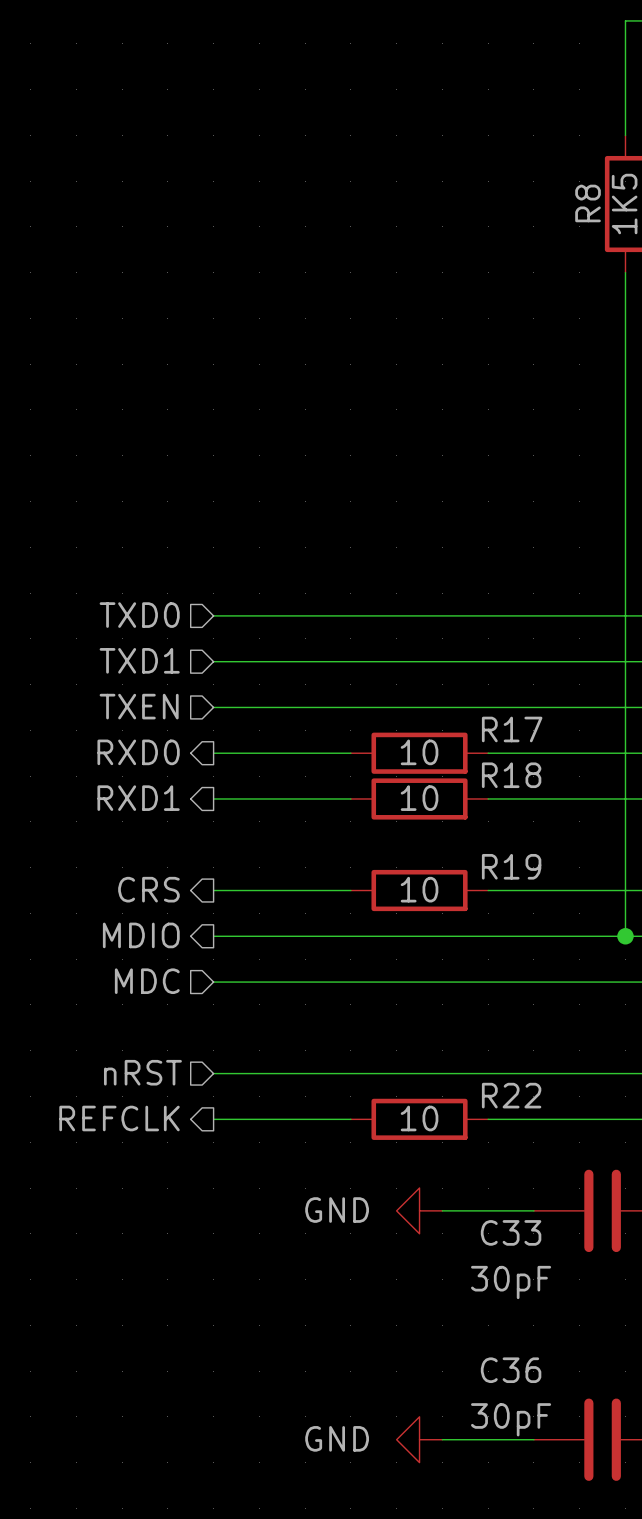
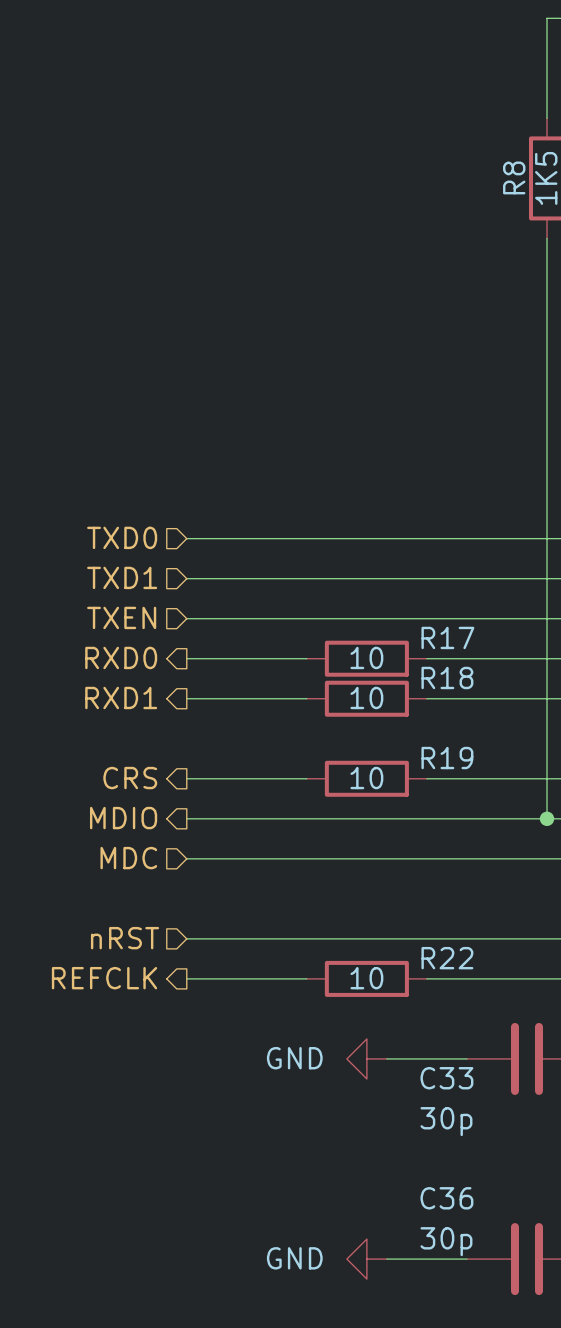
C33 value: 30pF (511, 1282) -> 30p (446, 1121)
C36 value: 30pF (511, 1419) -> 30p (446, 1241)

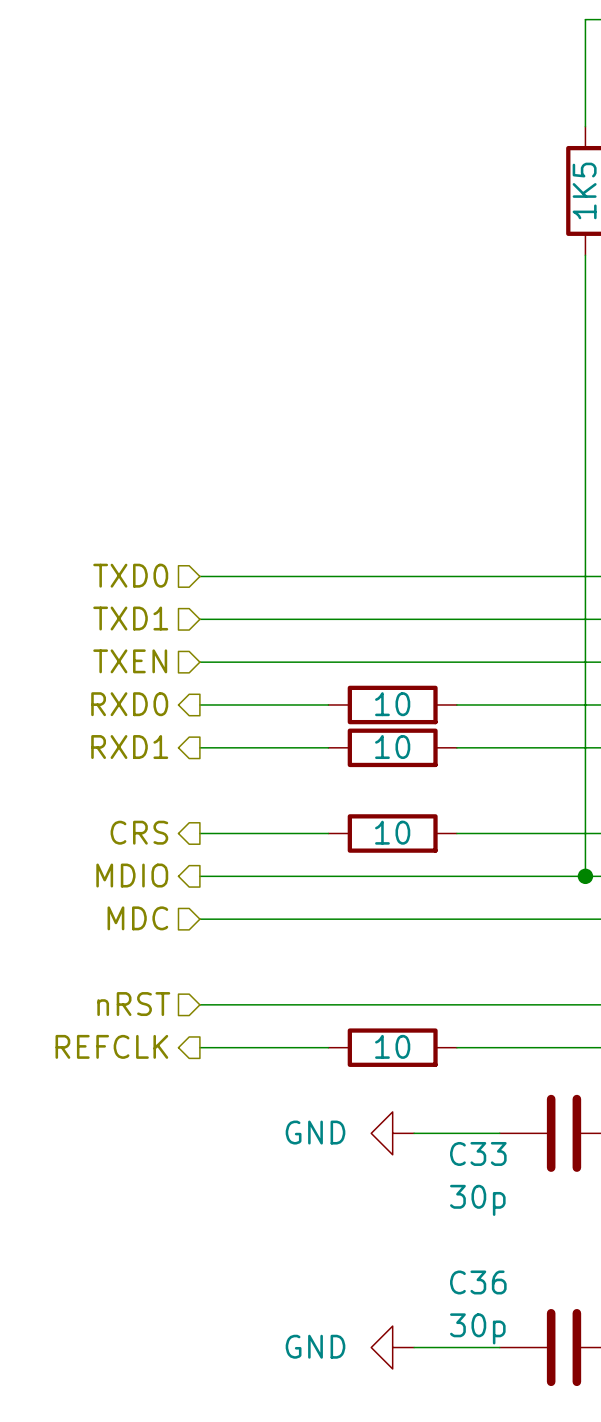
R8 name: R8 (514, 177) -> none
R17 name: R17 (447, 637) -> none
R18 name: R18 (447, 677) -> none
R19 name: R19 (447, 758) -> none
R22 name: R22 (447, 958) -> none

